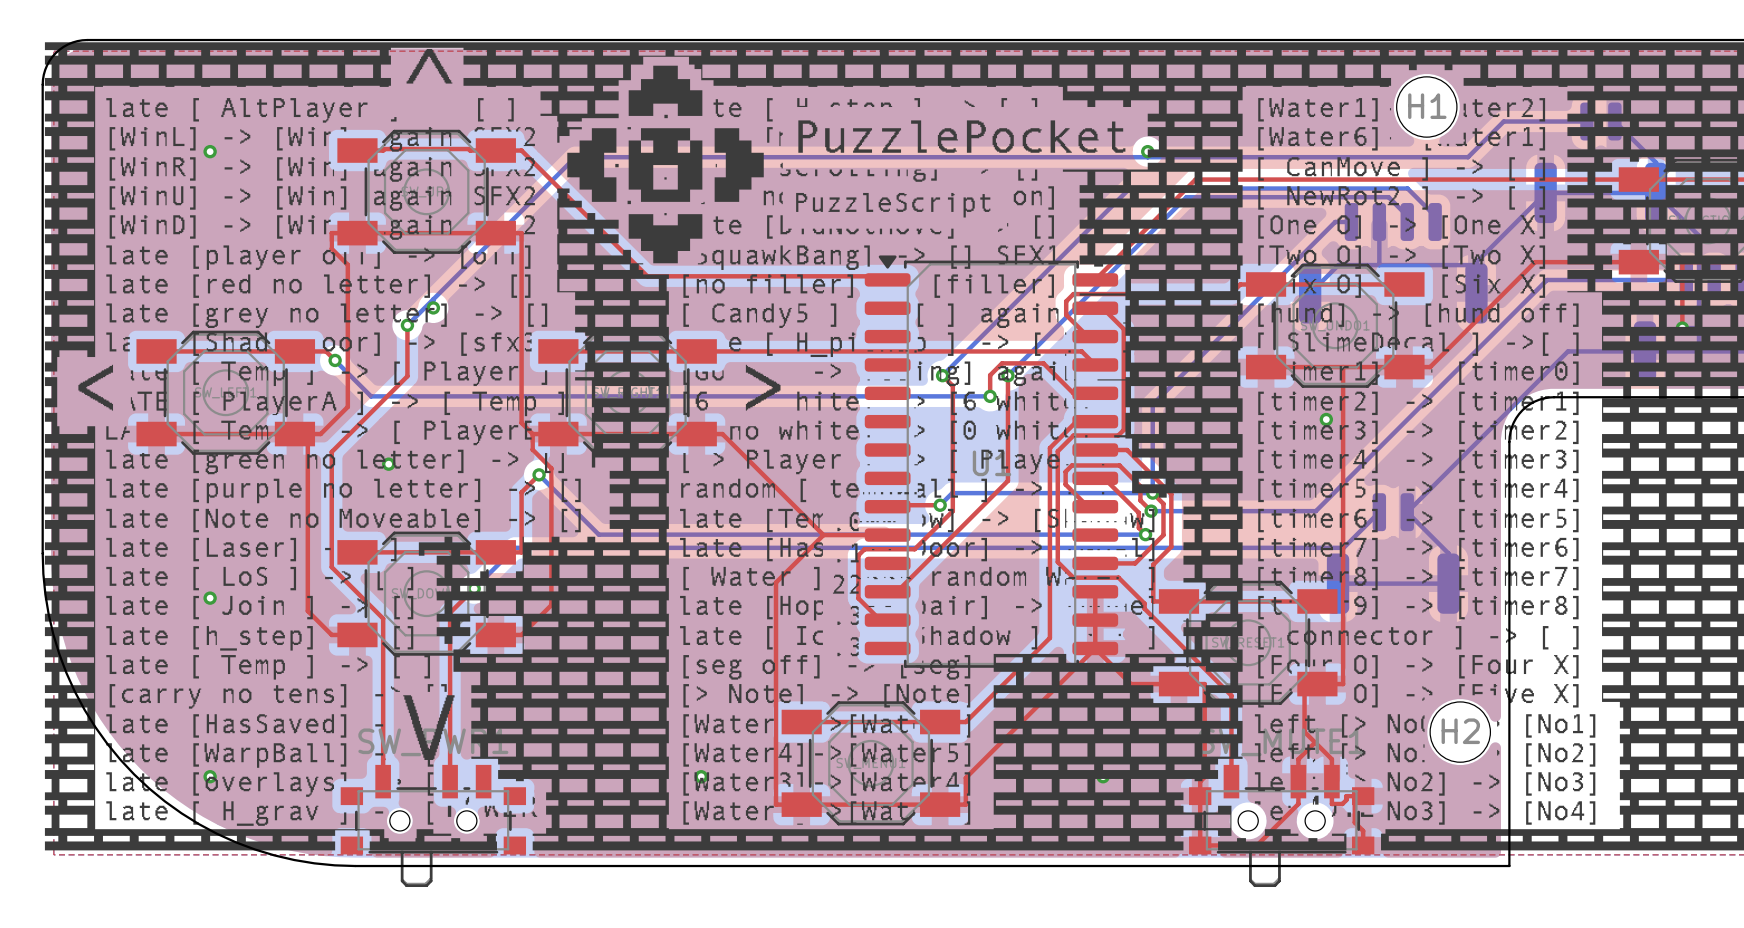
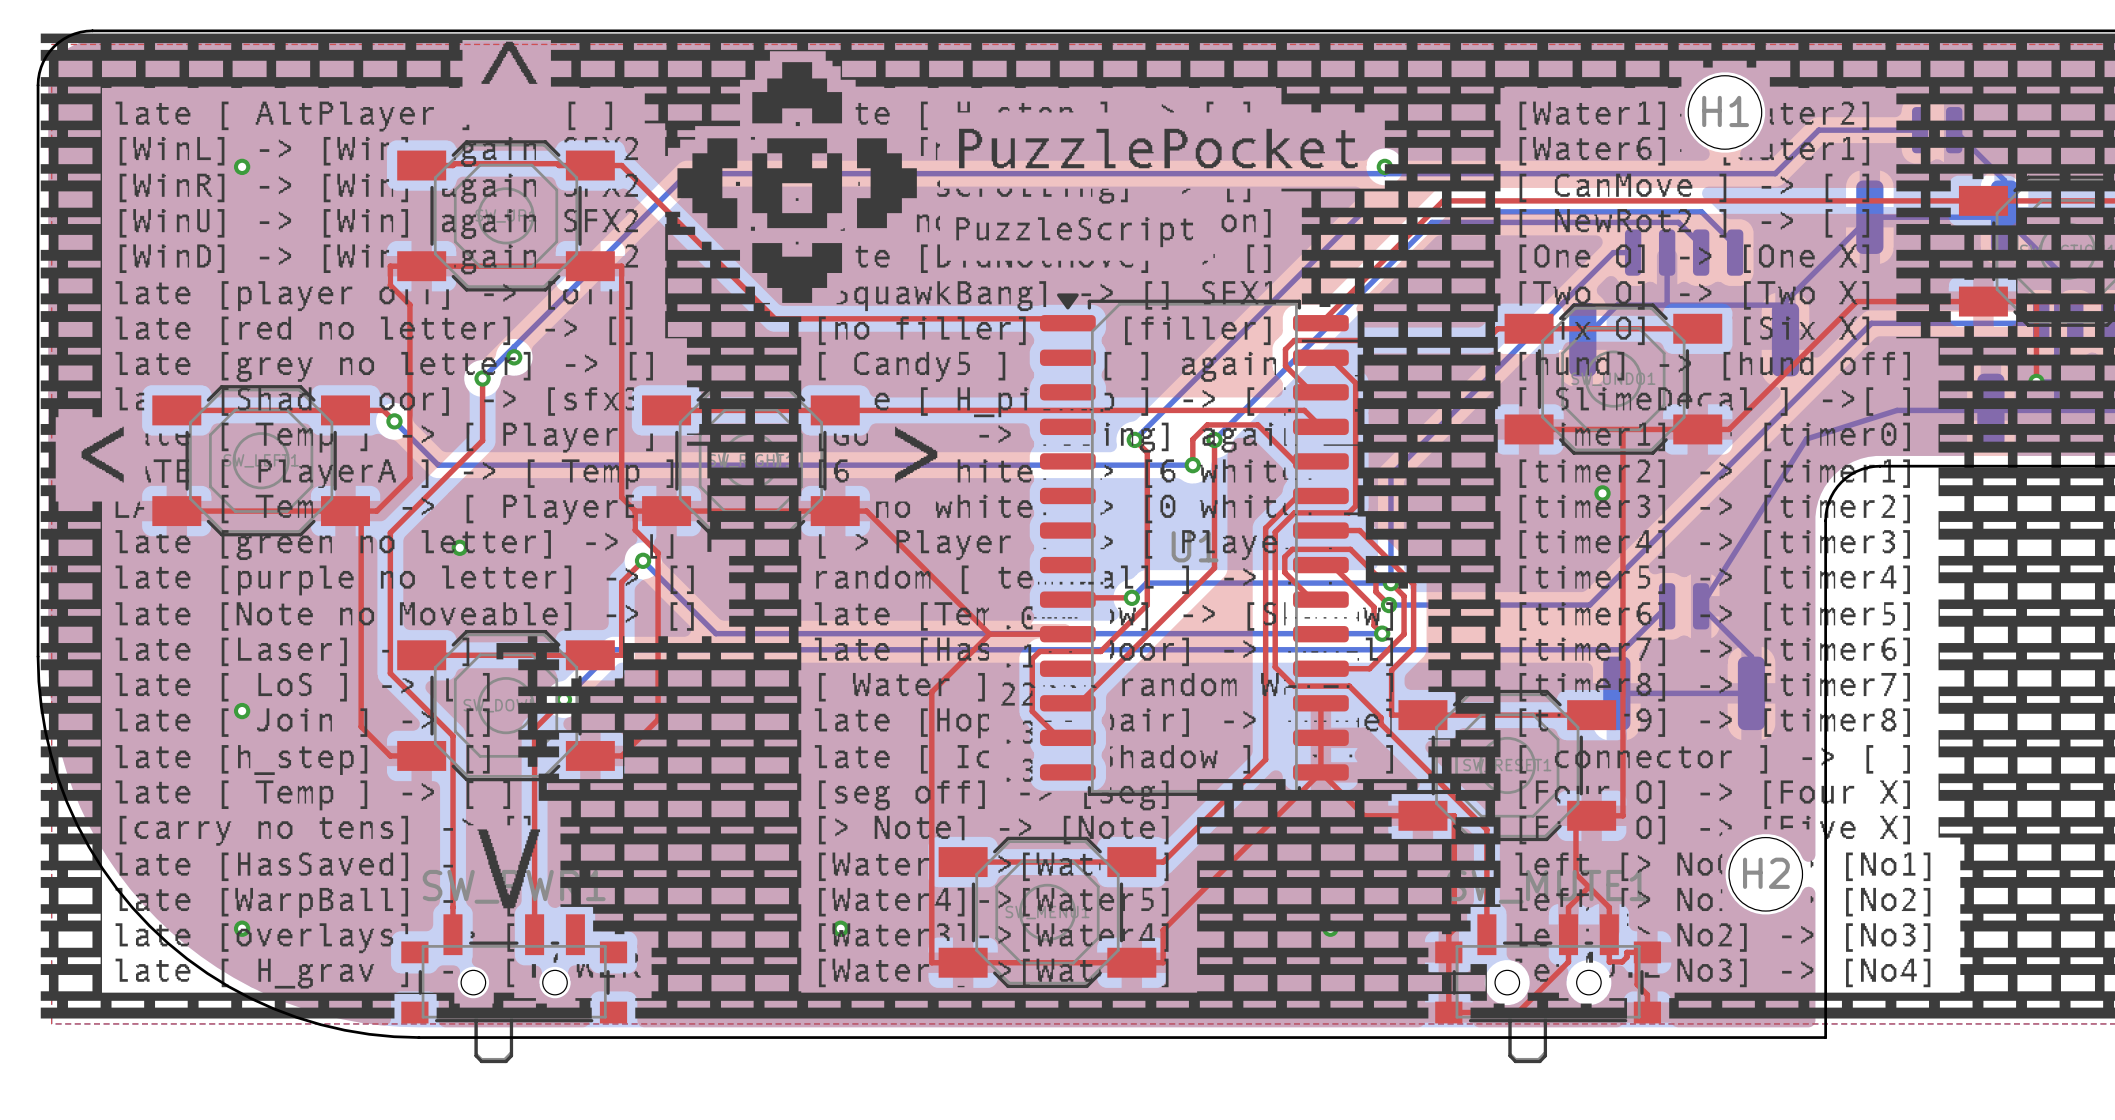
bottom track: (1567, 351) (1407, 512) -> (1897, 410) (1806, 438) (1701, 606)

